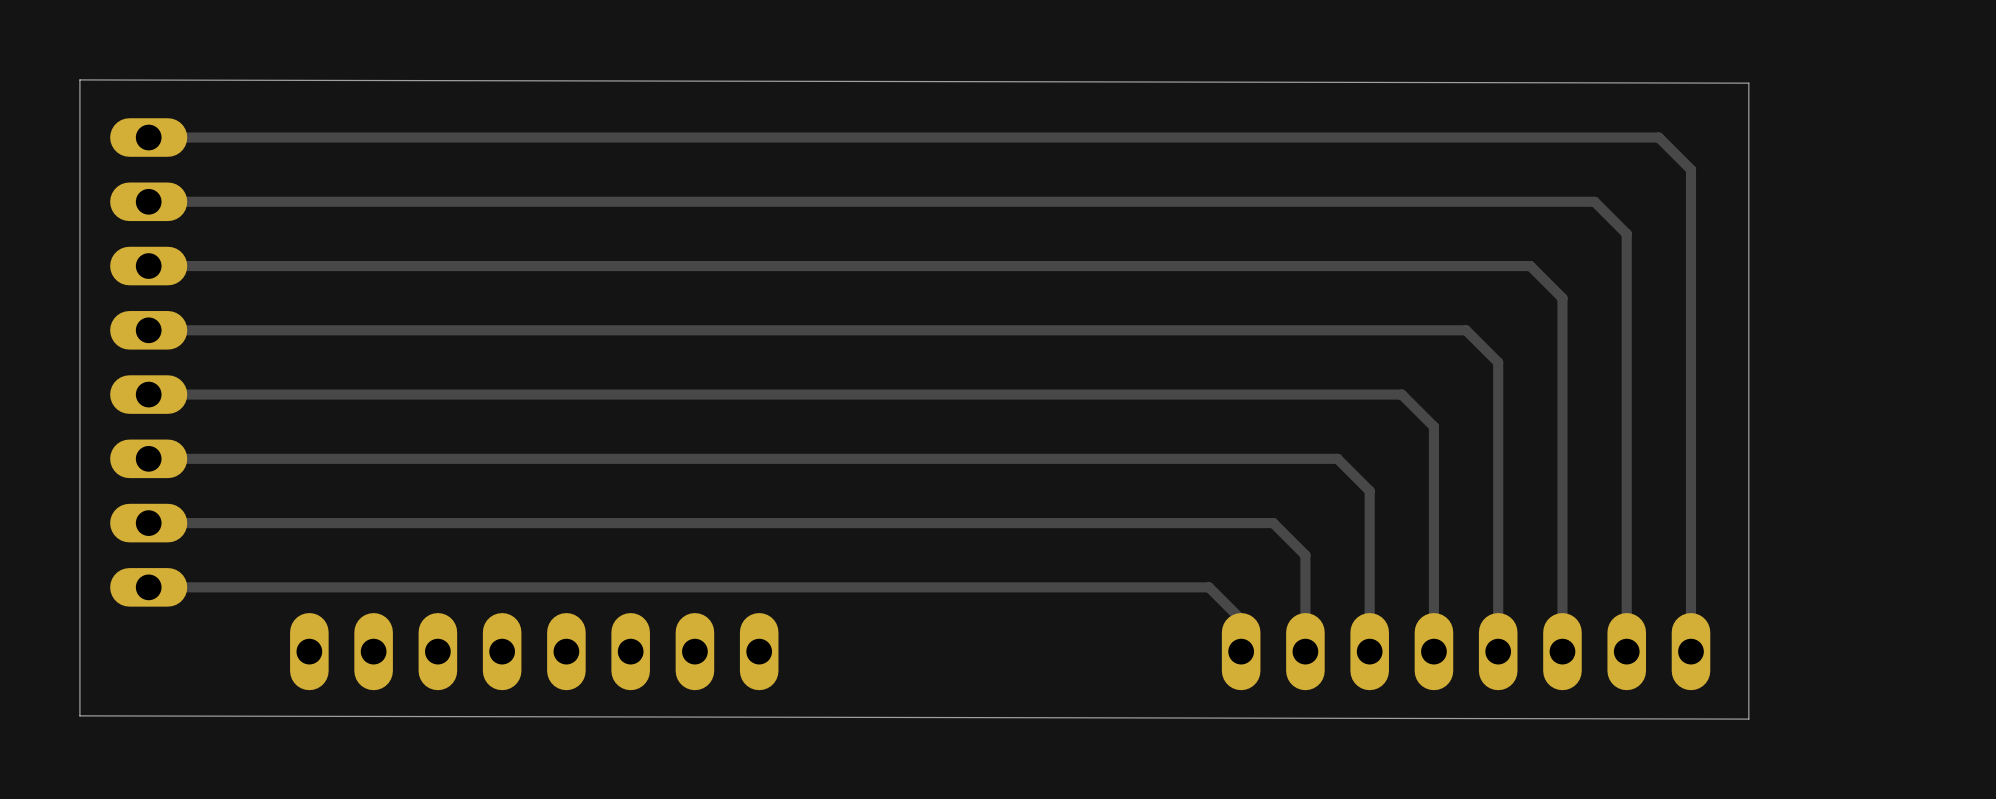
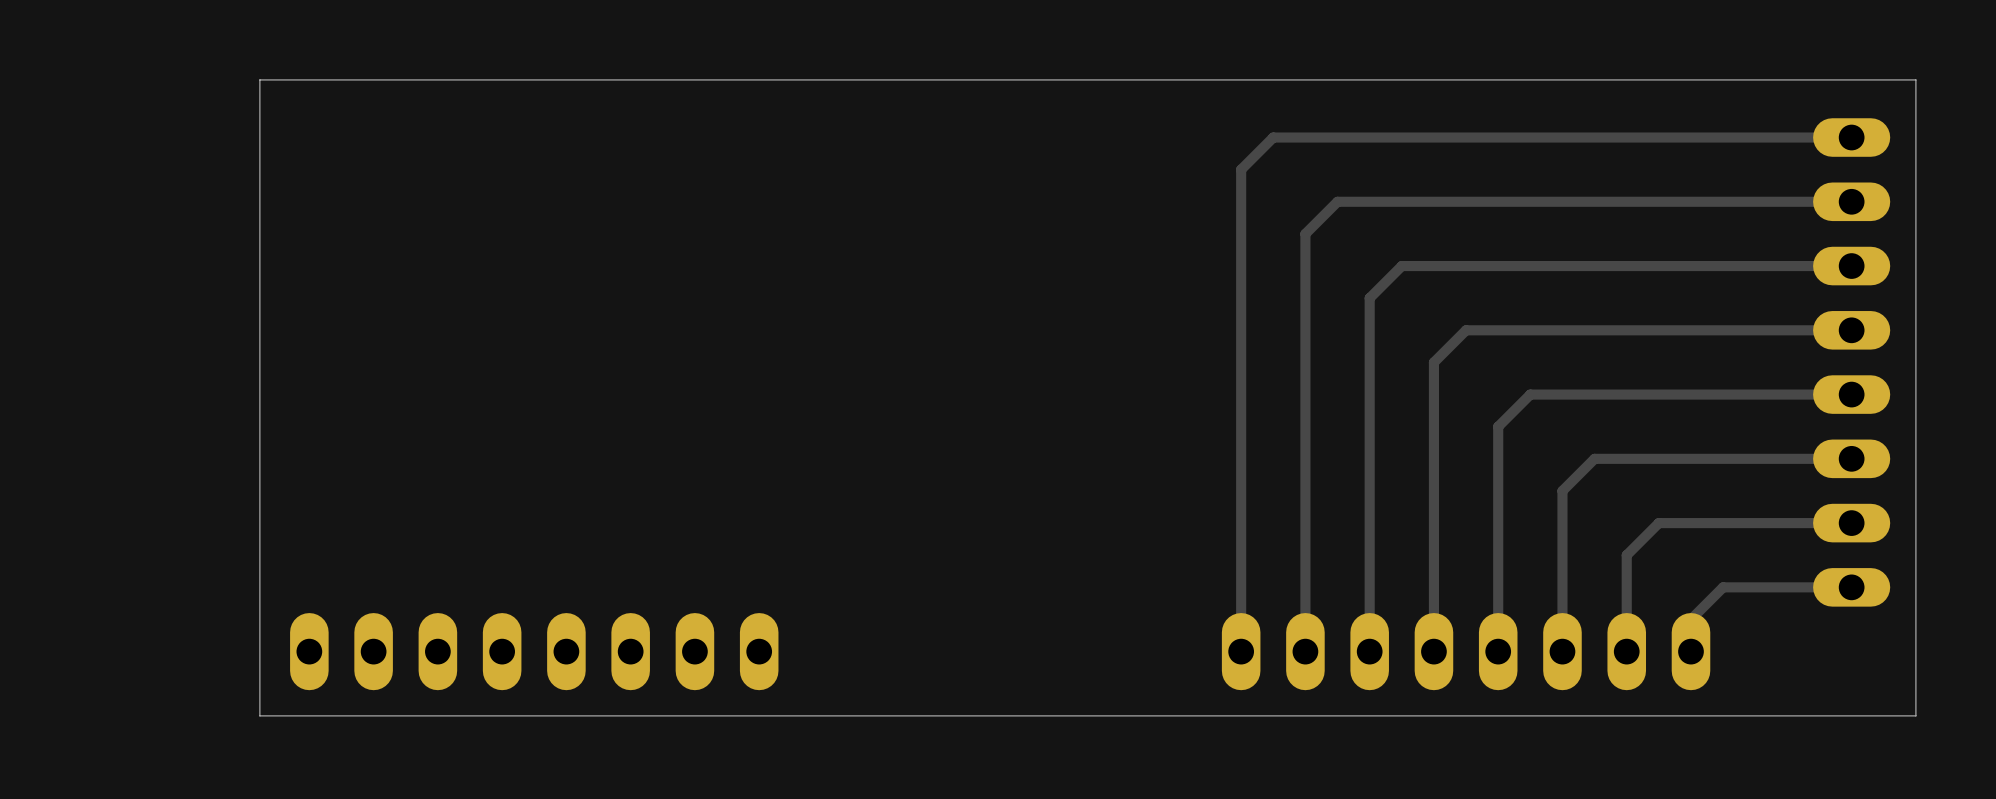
board edge: (79, 79) (79, 715) (1748, 719) (1748, 83) (79, 79) -> (1915, 79) (1915, 715) (259, 715) (259, 79) (1915, 79)
track: (1273, 137) (148, 137) -> (1273, 137) (1241, 169) (1241, 619)
track: (1658, 137) (1690, 169) (1690, 619) -> (1851, 587) (1723, 587) (1690, 619)
track: none -> (1851, 137) (1658, 137)
track: (1337, 201) (148, 201) -> (1337, 201) (1305, 233) (1305, 555)
track: (1594, 201) (1626, 233) (1626, 555) -> (1851, 523) (1658, 523) (1626, 555)
track: none -> (1851, 201) (1594, 201)
track: (1401, 266) (148, 266) -> (1401, 266) (1369, 298) (1369, 490)
track: (1530, 266) (1562, 298) (1562, 490) -> (1530, 266) (1851, 266)
track: (148, 330) (1466, 330) (1498, 362) (1498, 426) -> (1851, 394) (1530, 394) (1498, 426)
part: (148, 362) -> none
part: none -> (1851, 362)
track: (148, 394) (1401, 394) (1433, 426) -> (1851, 330) (1466, 330) (1433, 362) (1433, 426)
track: (148, 458) (1337, 458) (1369, 490) -> none
track: none -> (1851, 458) (1594, 458) (1562, 490)
track: (148, 523) (1273, 523) (1305, 555) -> none
track: (148, 587) (1209, 587) (1241, 619) -> none

